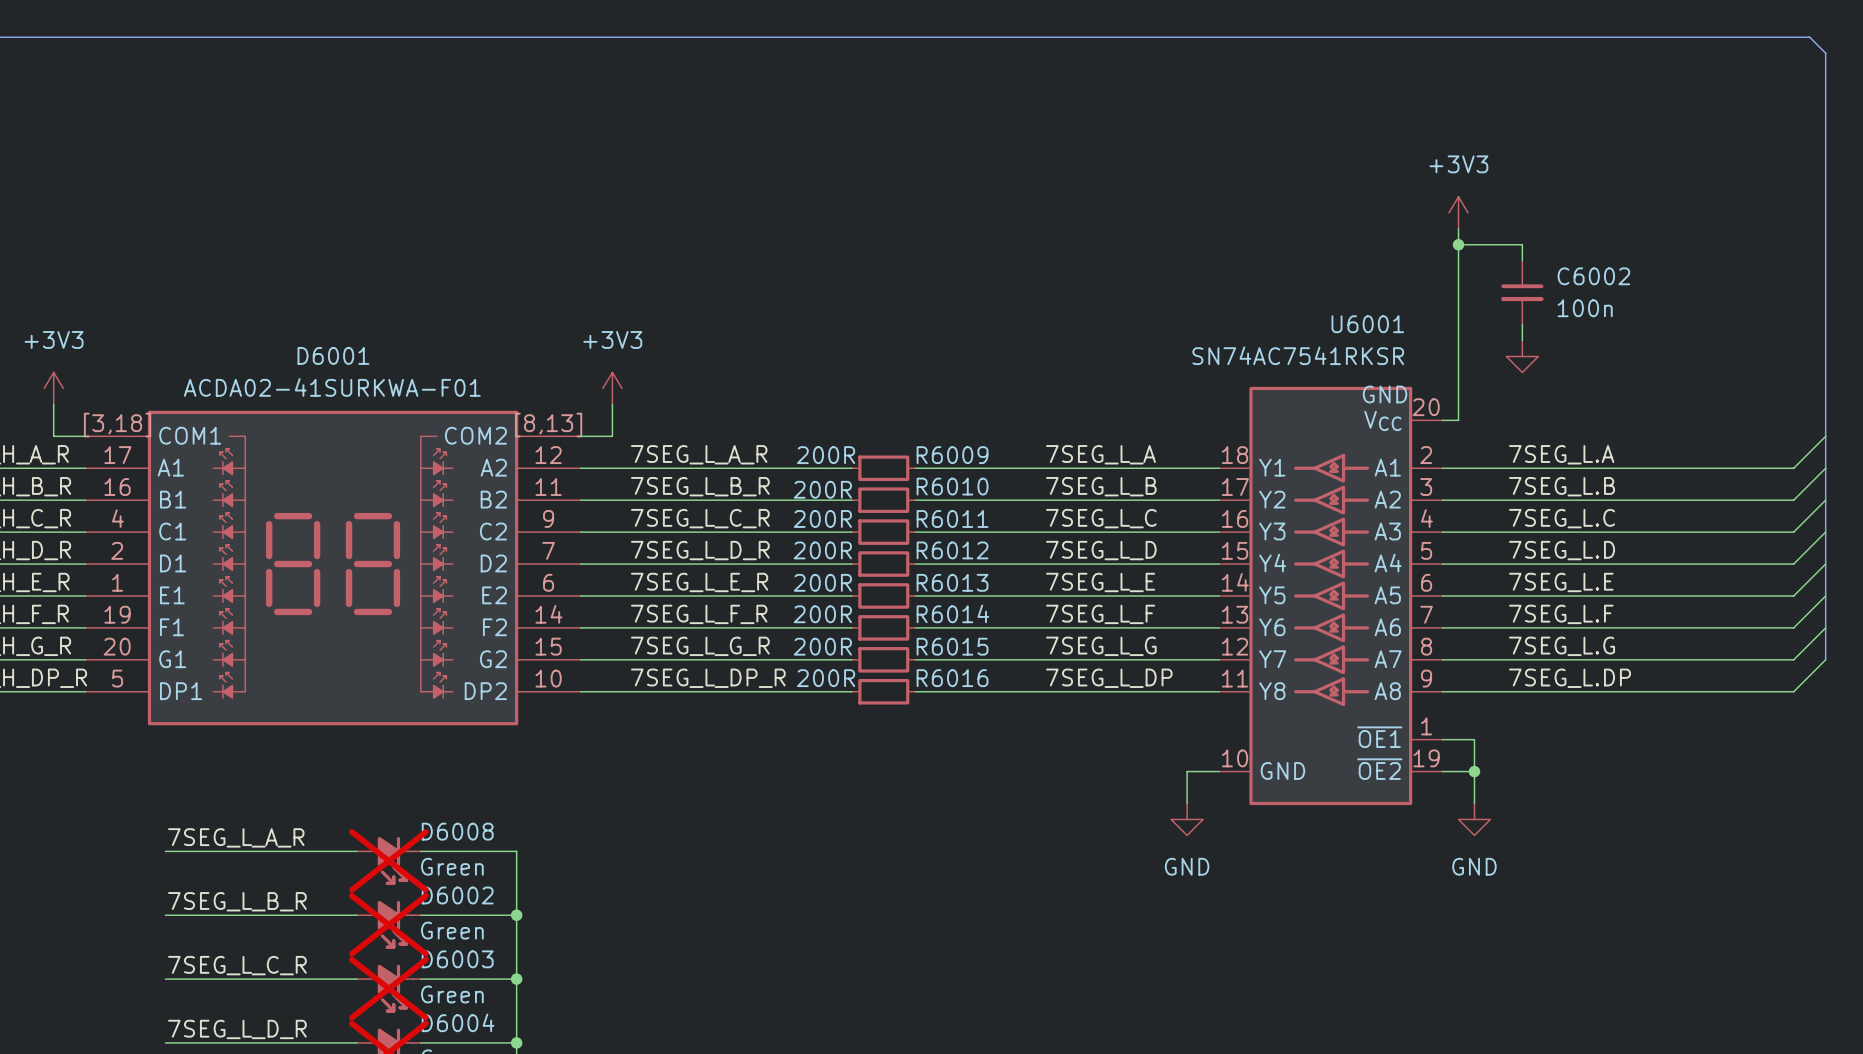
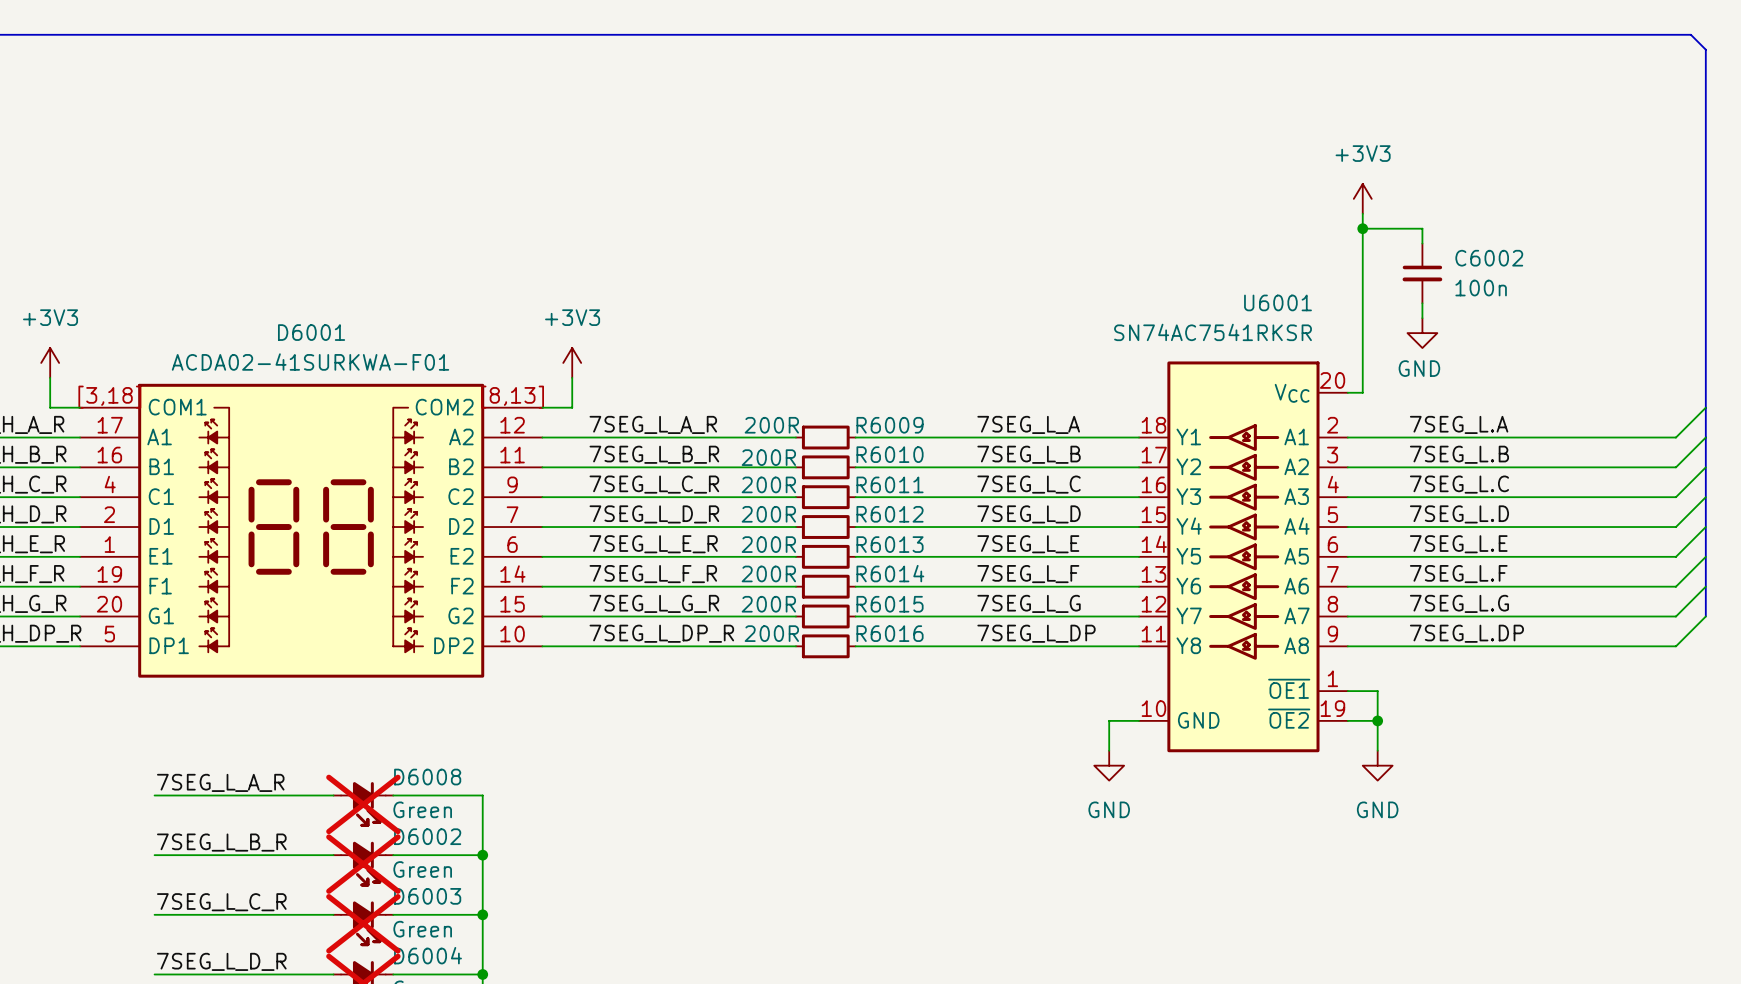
power symbol text position: GND (1385, 394) -> GND (1419, 368)

